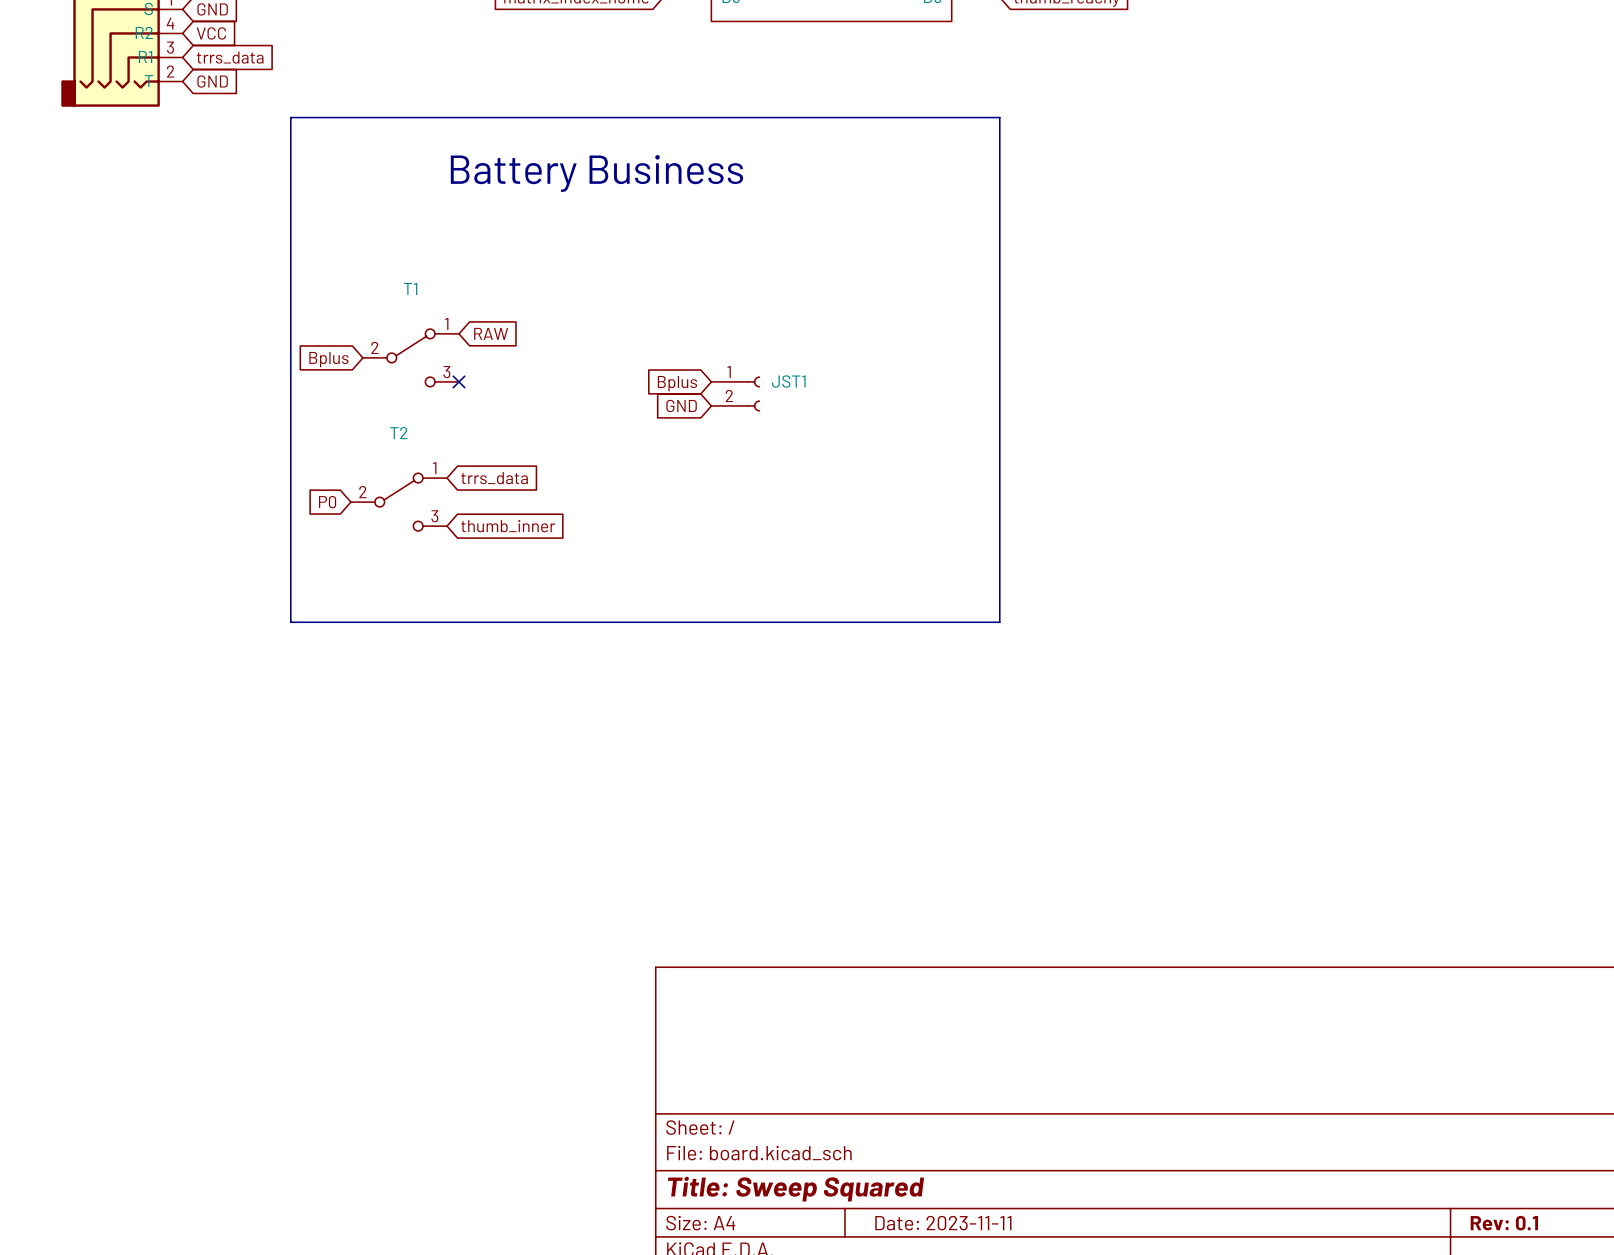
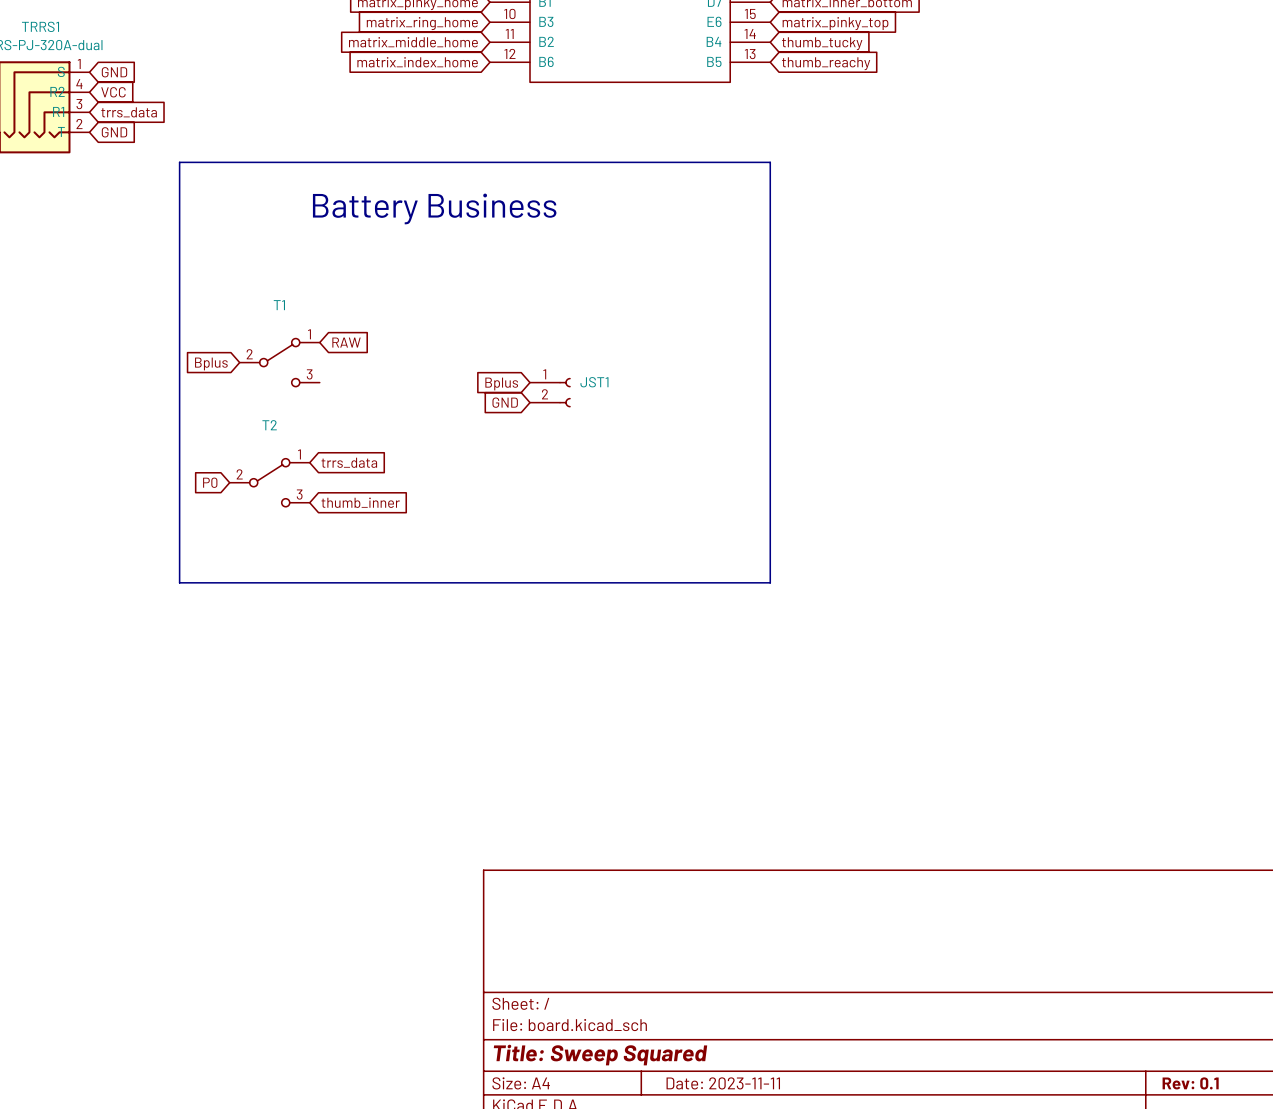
no-connect mark: (459, 381) -> none

